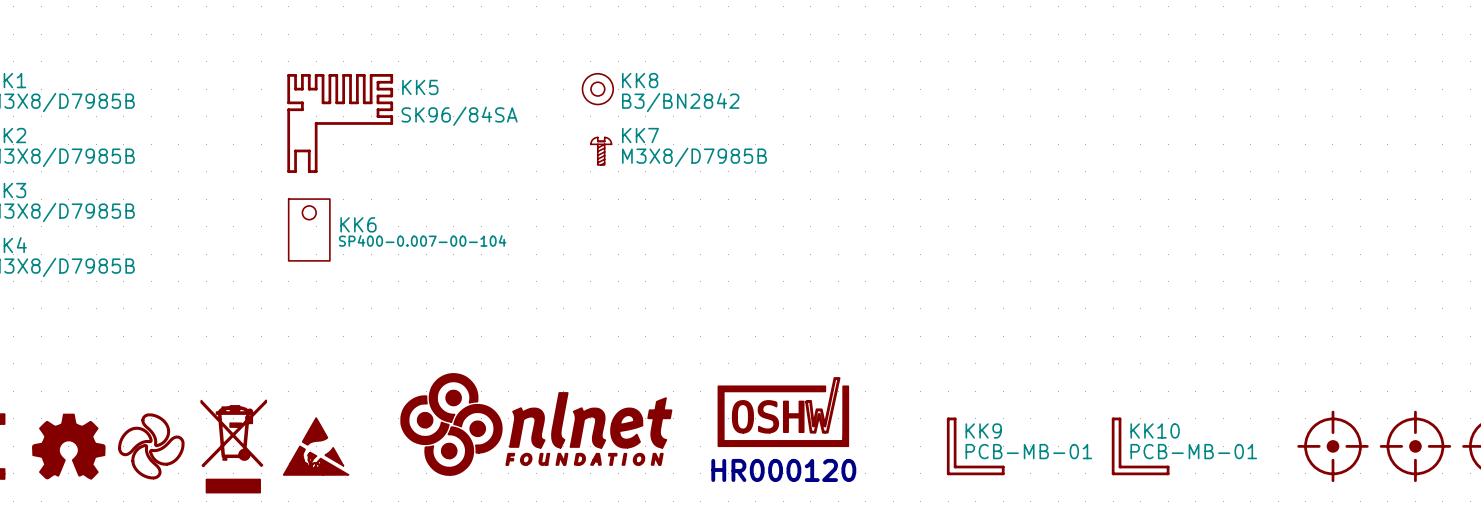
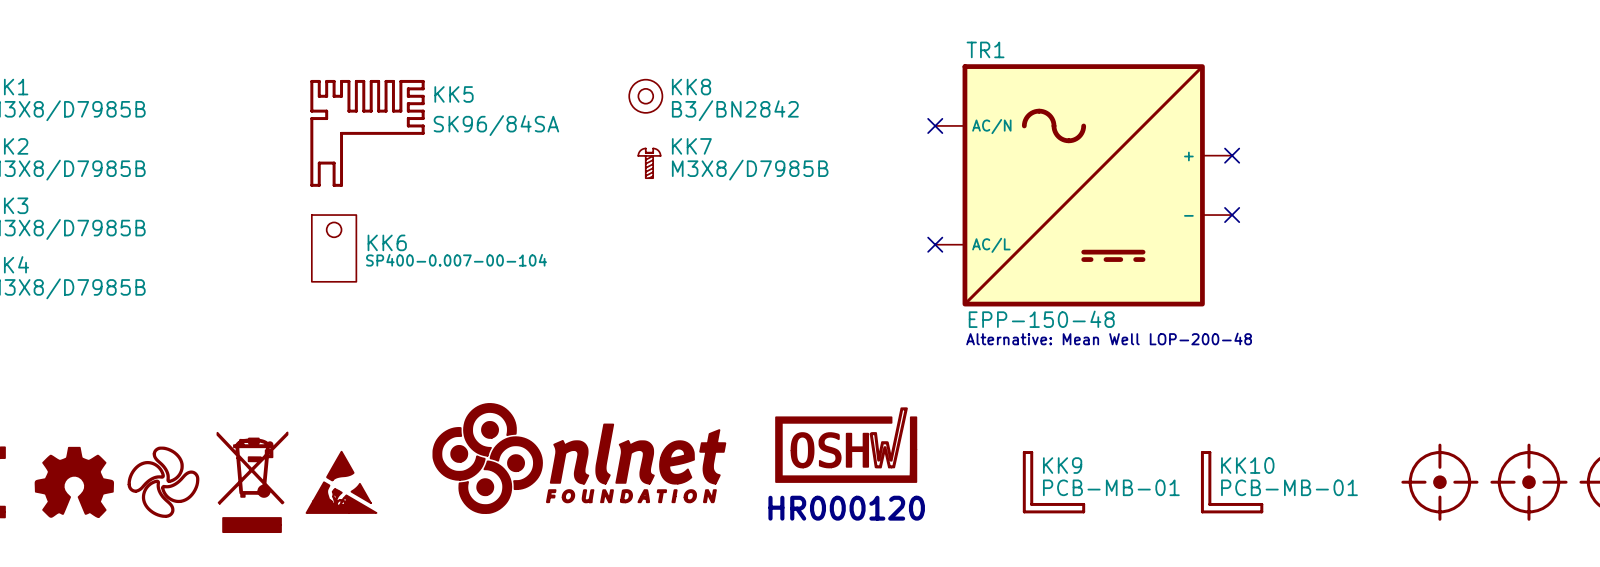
no-connect mark: none -> (935, 125)
no-connect mark: none -> (1232, 155)
TR1: none -> EPP-150-48 (1083, 185)
no-connect mark: none -> (1232, 215)
no-connect mark: none -> (935, 244)
text: none -> Alternative: Mean Well LOP-200-48 (1109, 338)

